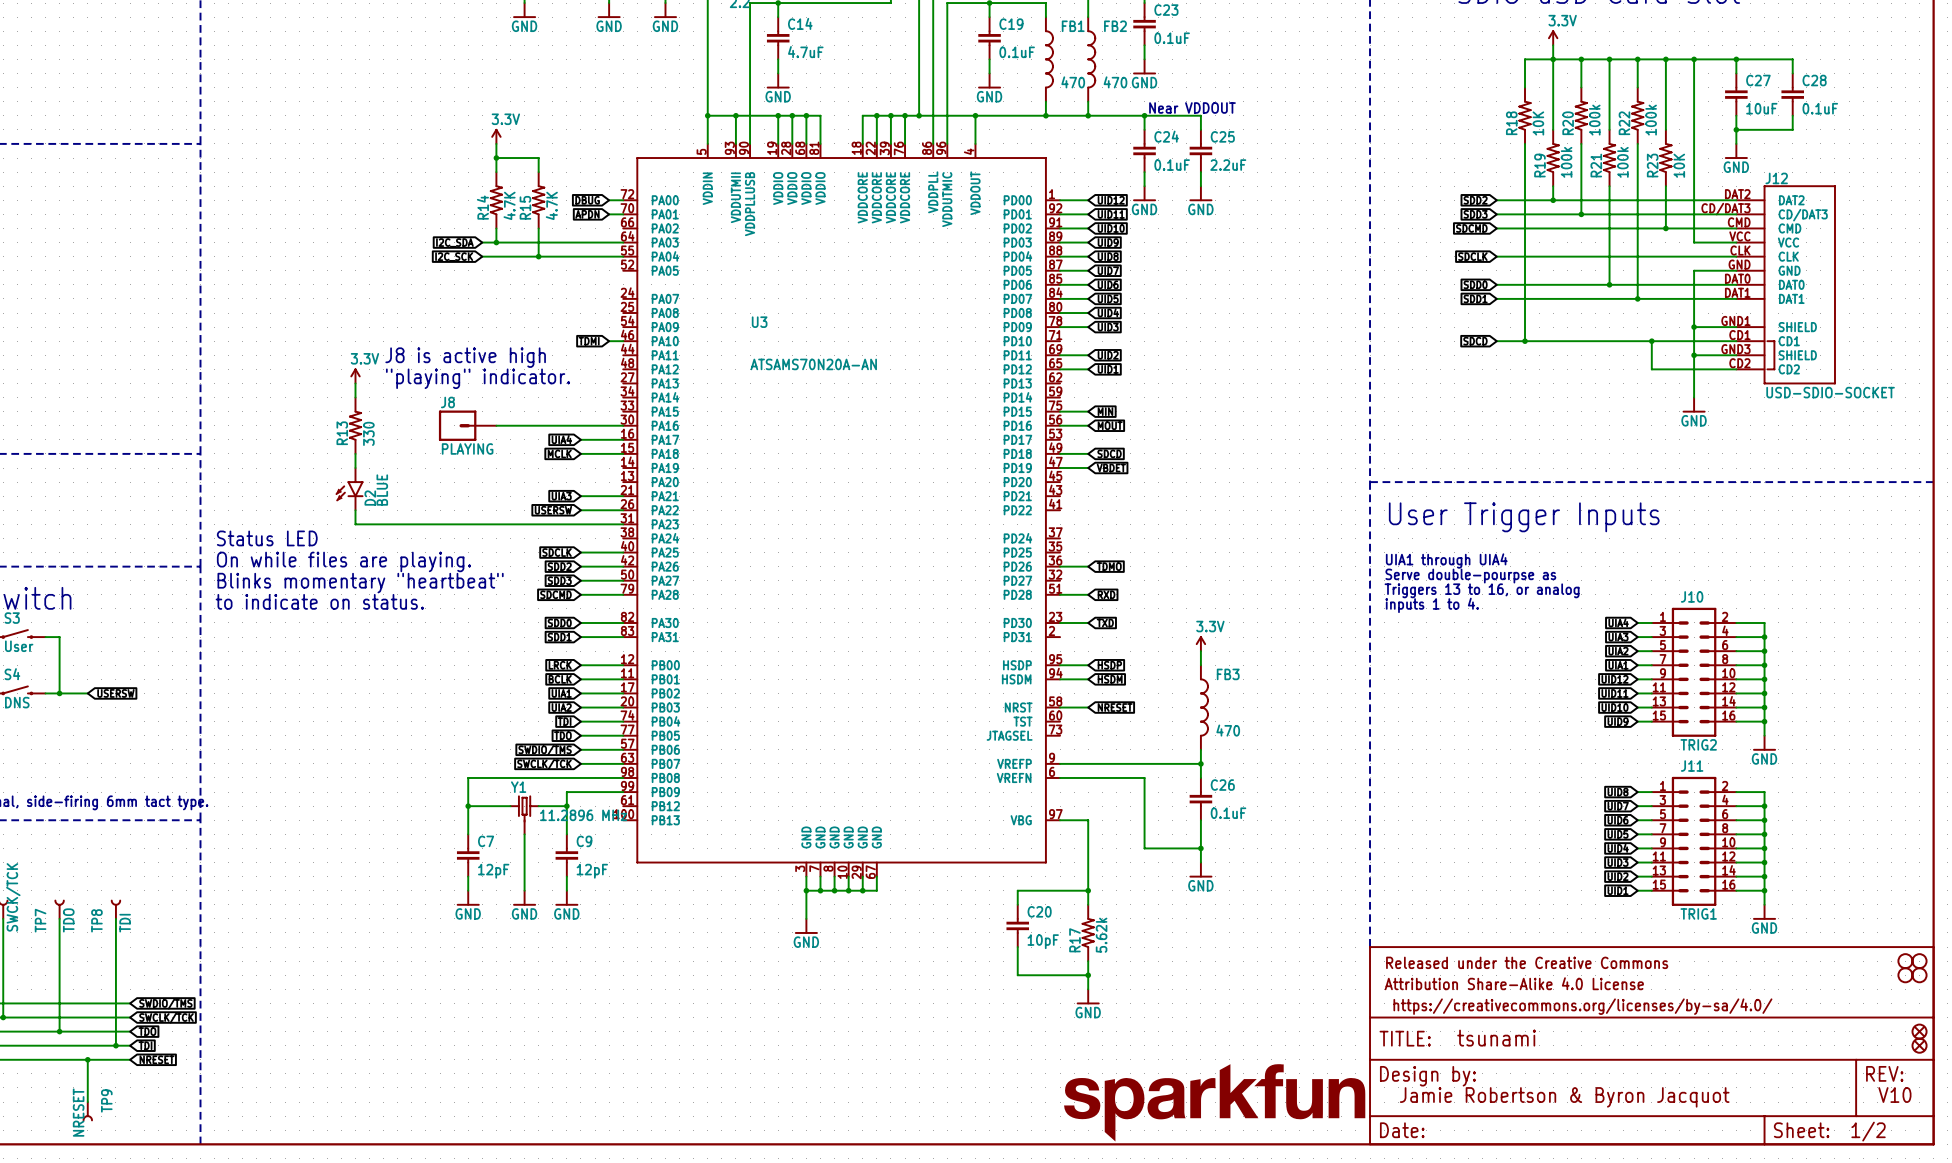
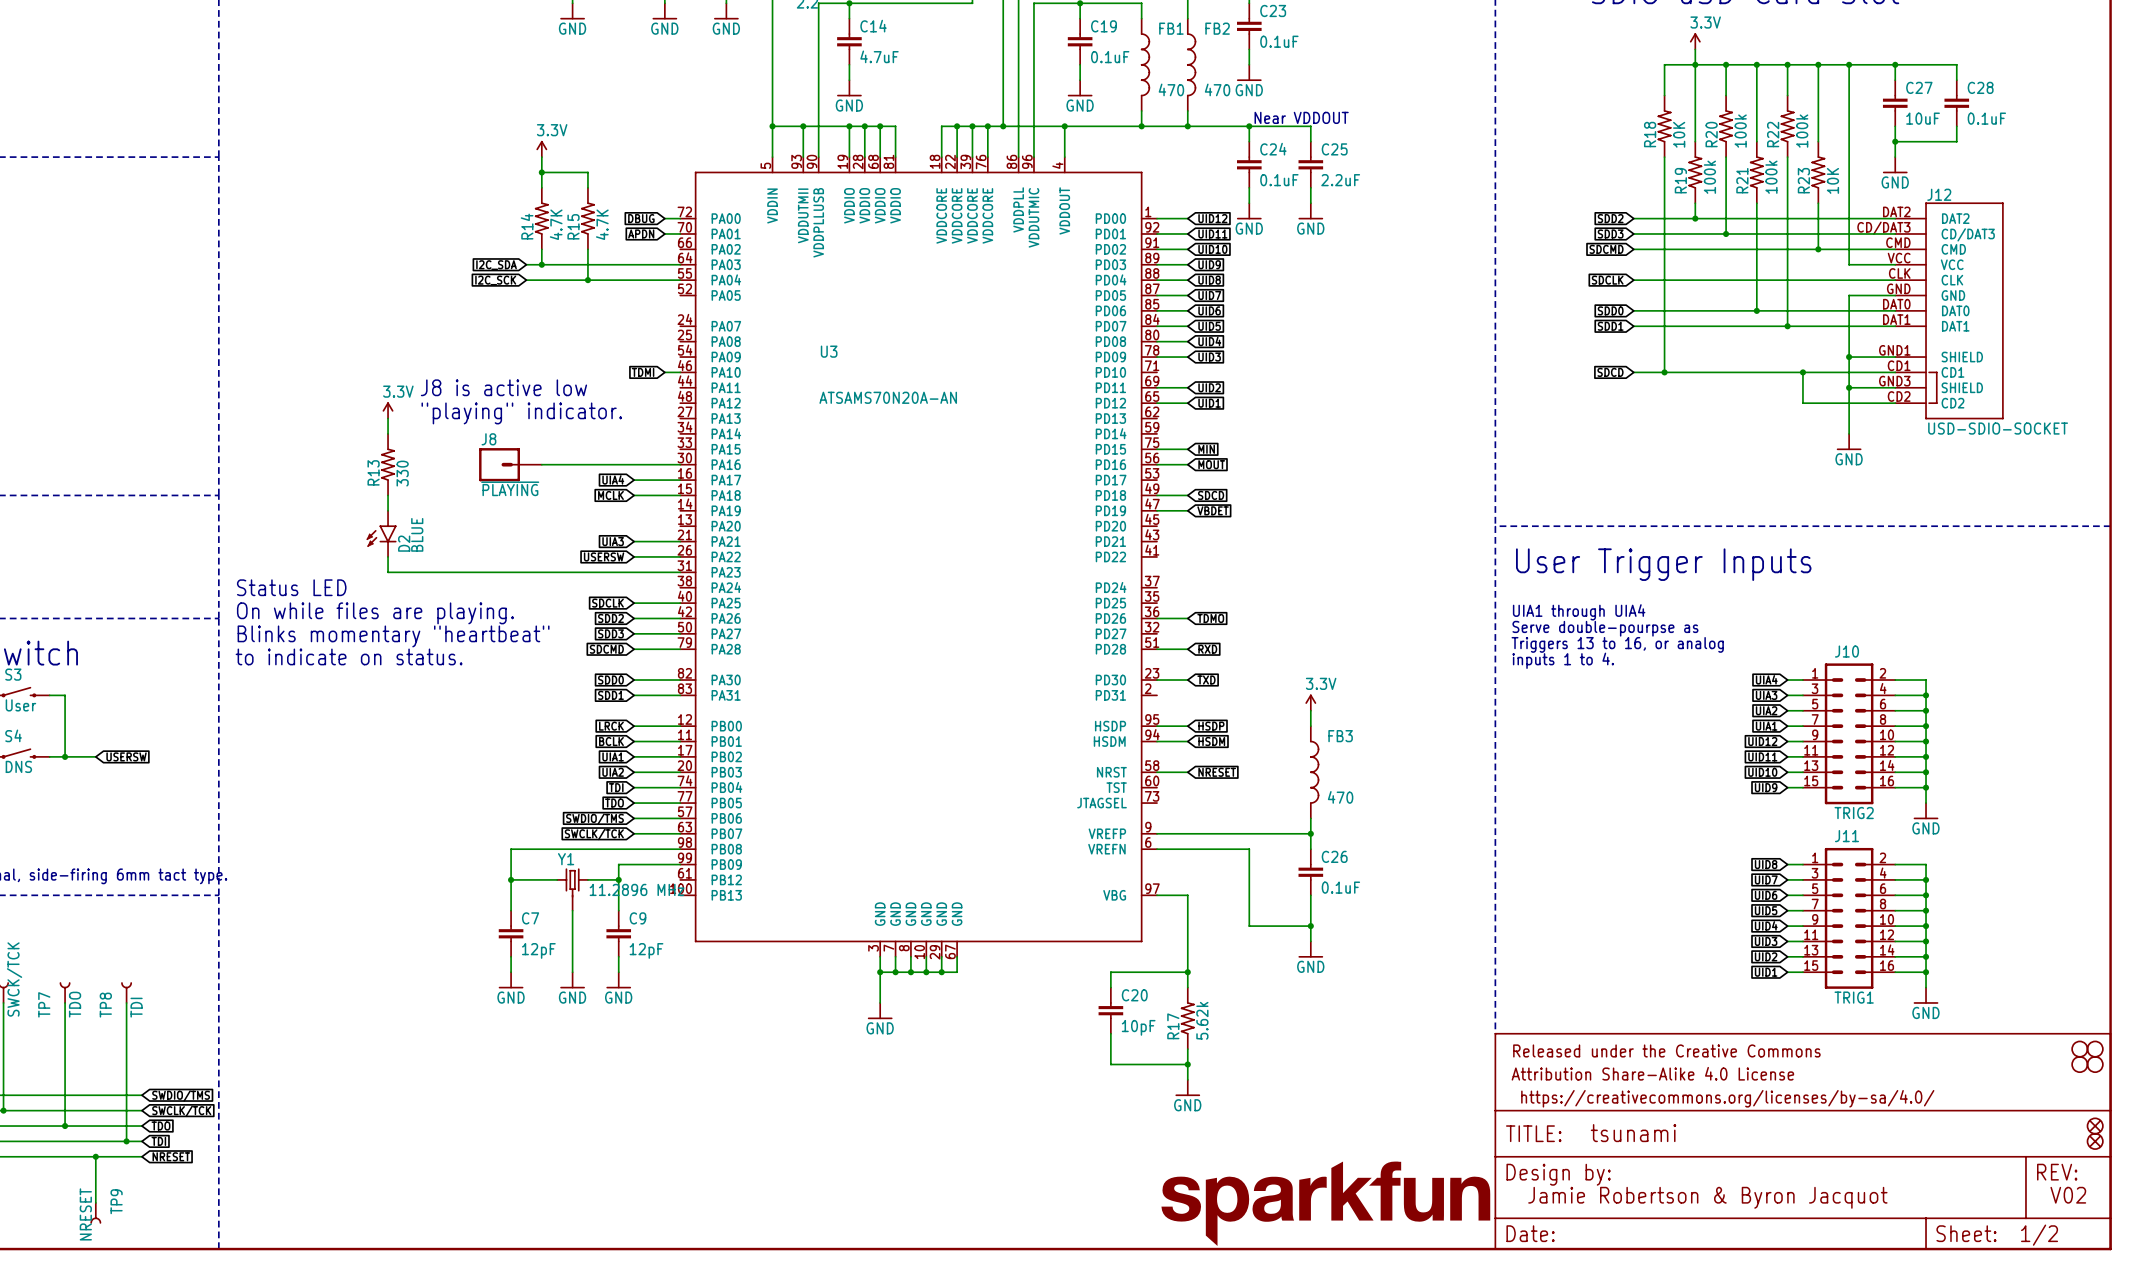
text: J8 is active high (465, 357) -> J8 is active low (503, 387)
J8 value: PLAYING (467, 448) -> ~{PLAYING} (510, 488)
text: V10 (1894, 1095) -> V02 (2068, 1195)

